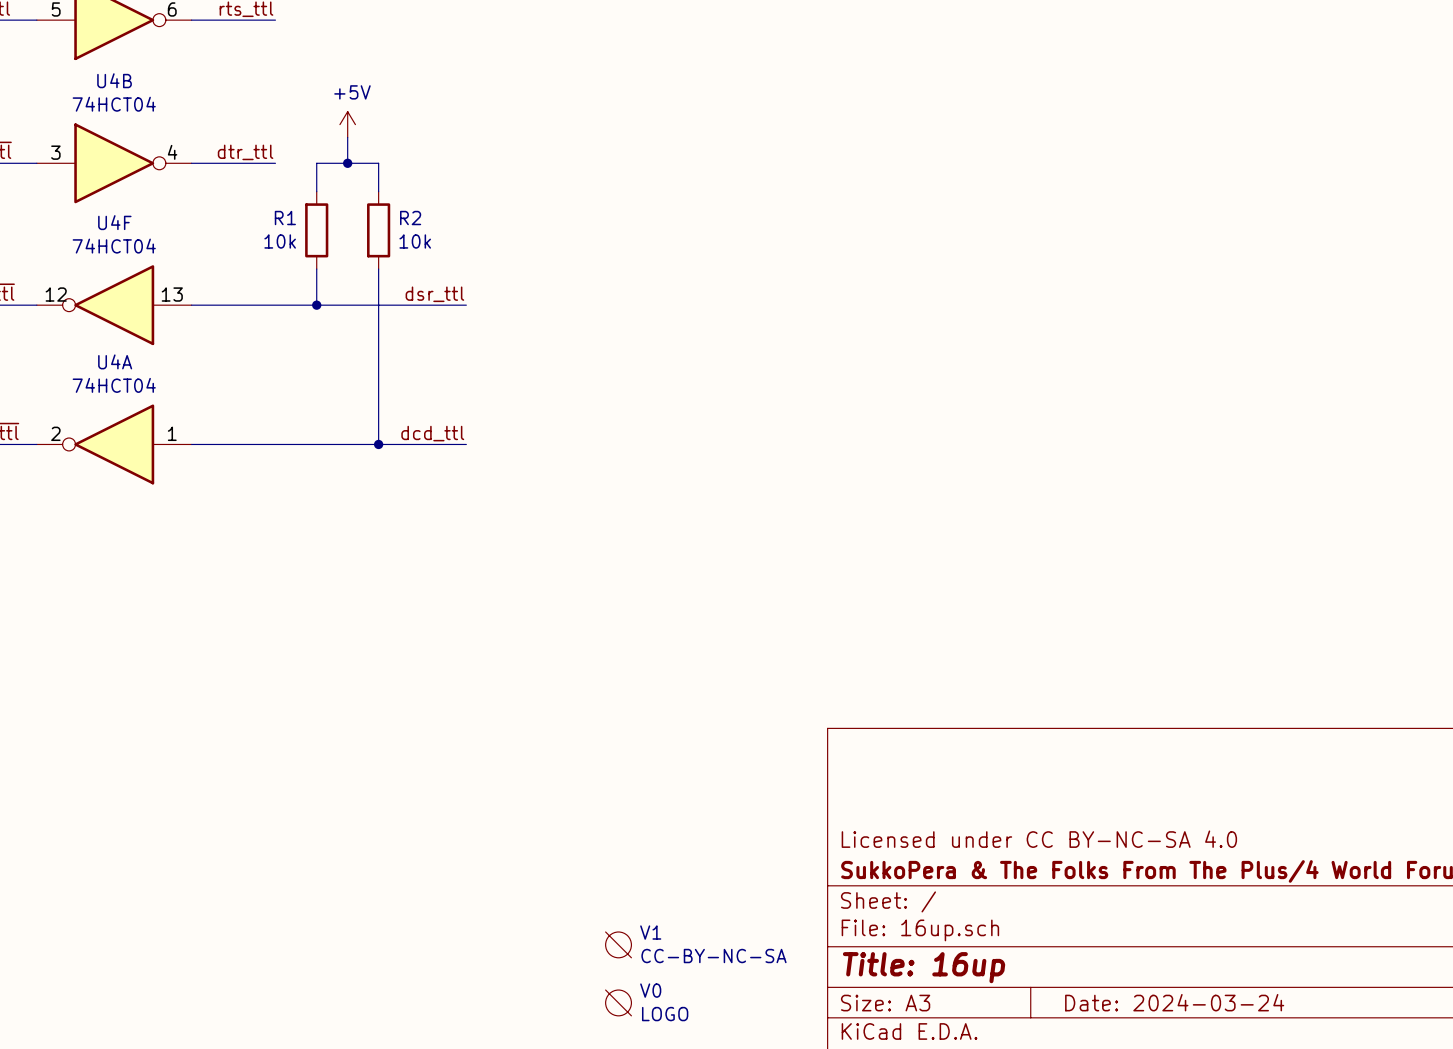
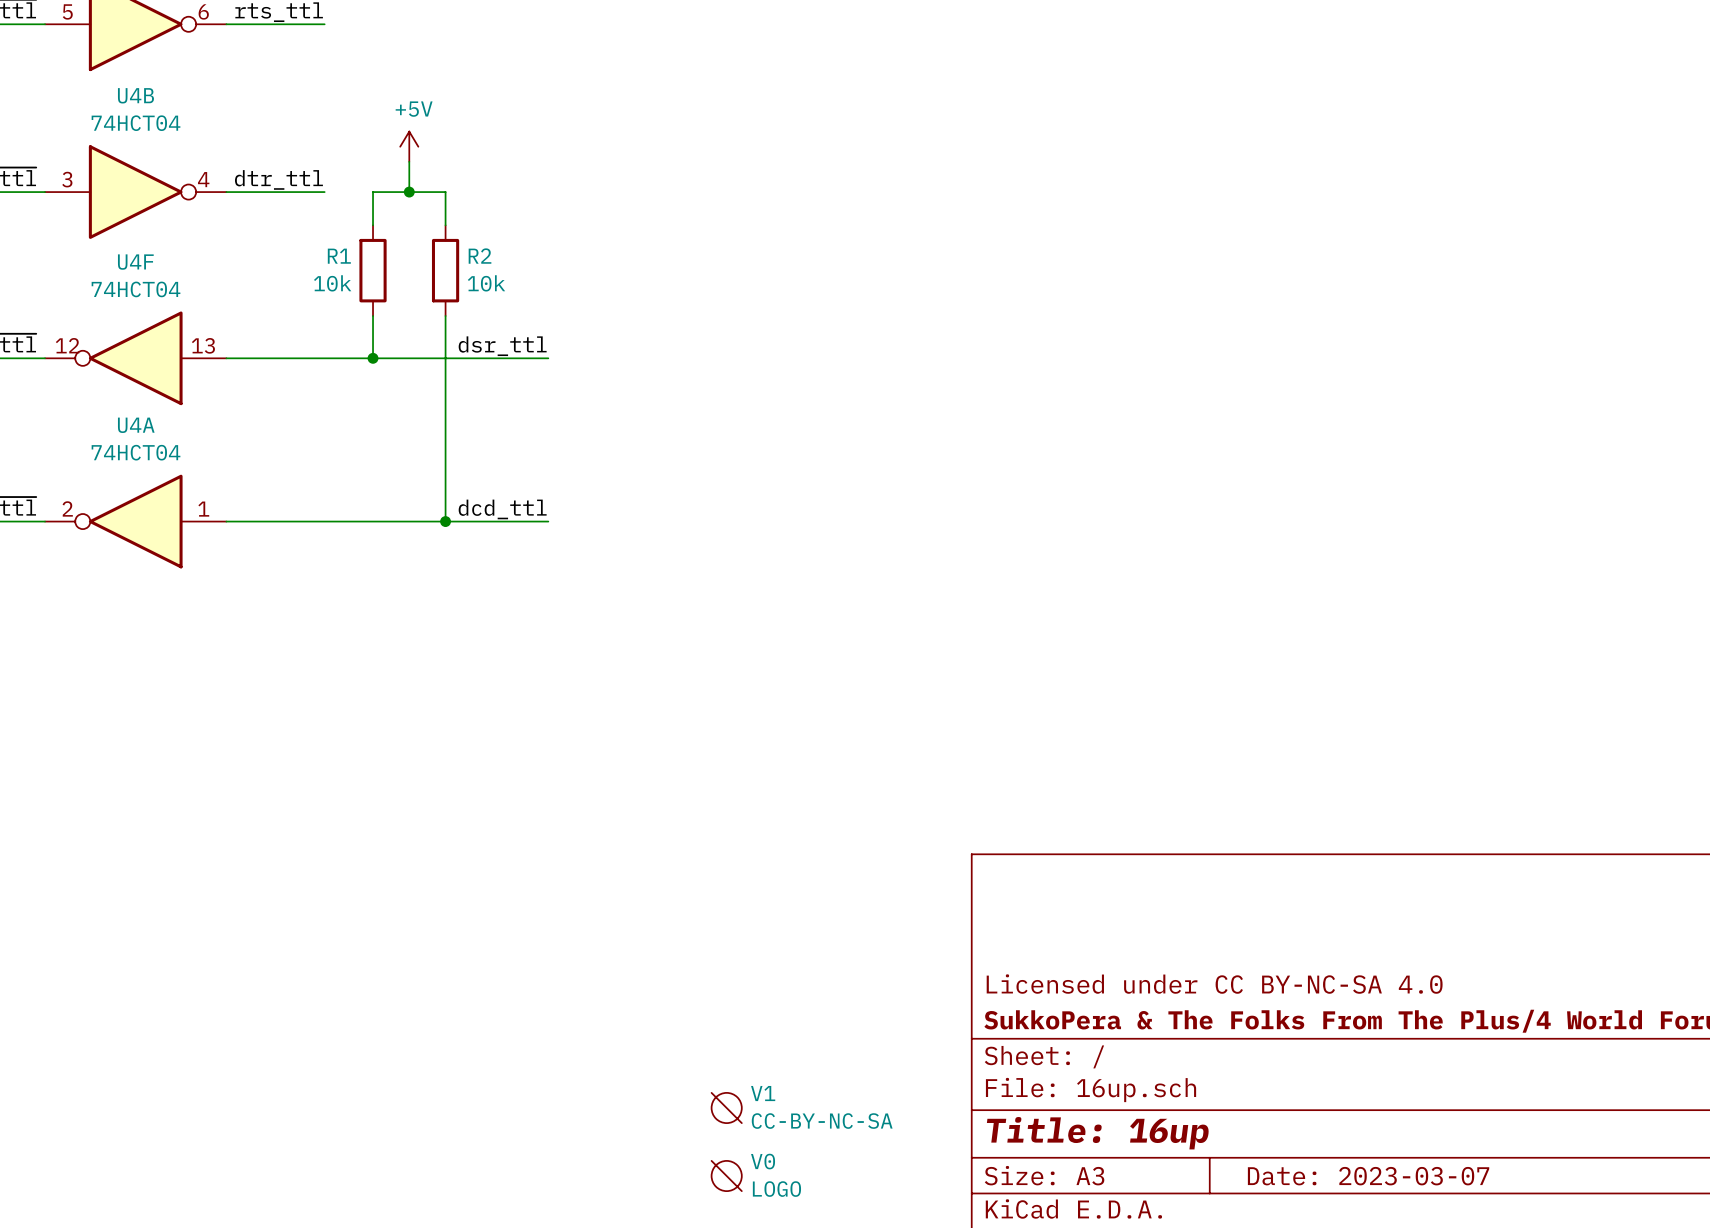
title block: Date: 2024-03-24 (1174, 1002) -> Date: 2023-03-07 (1368, 1176)

